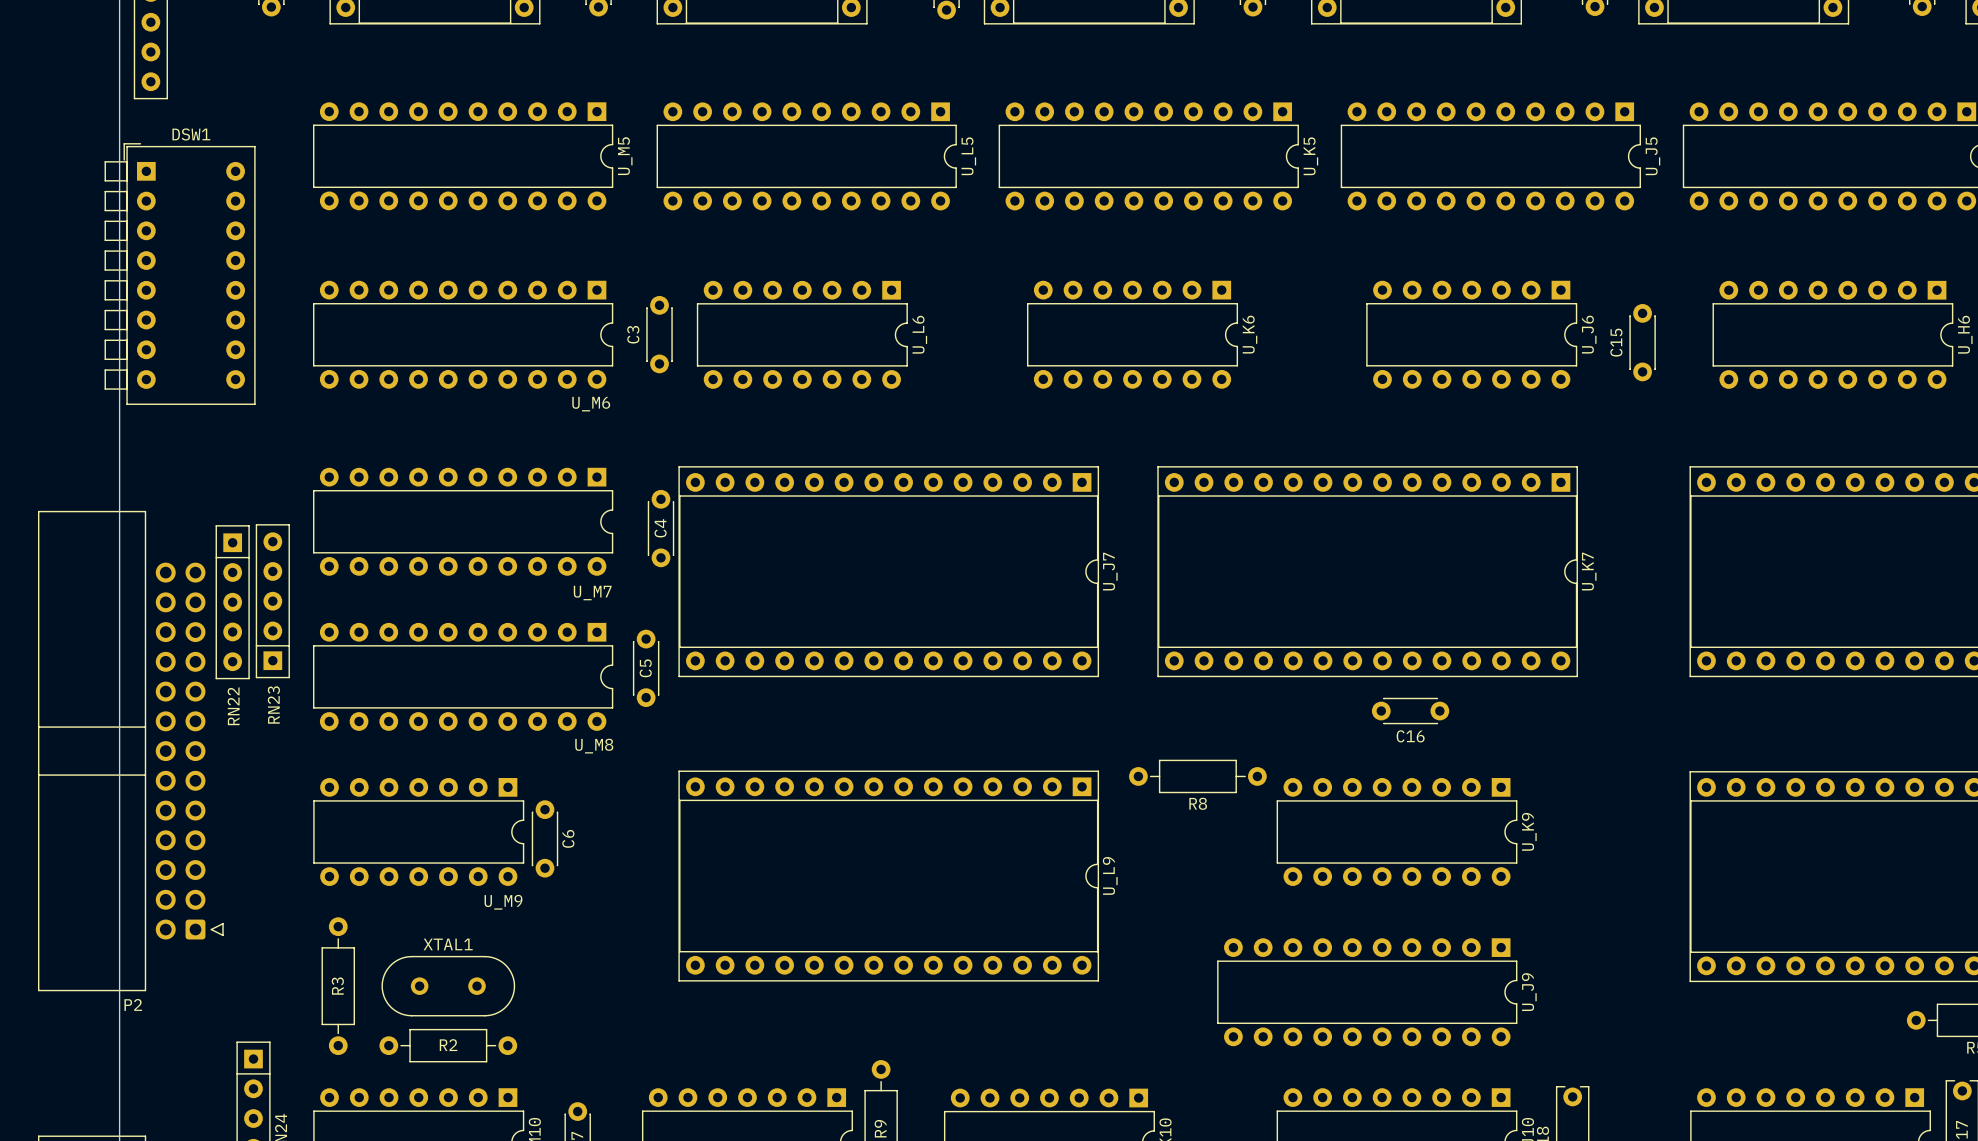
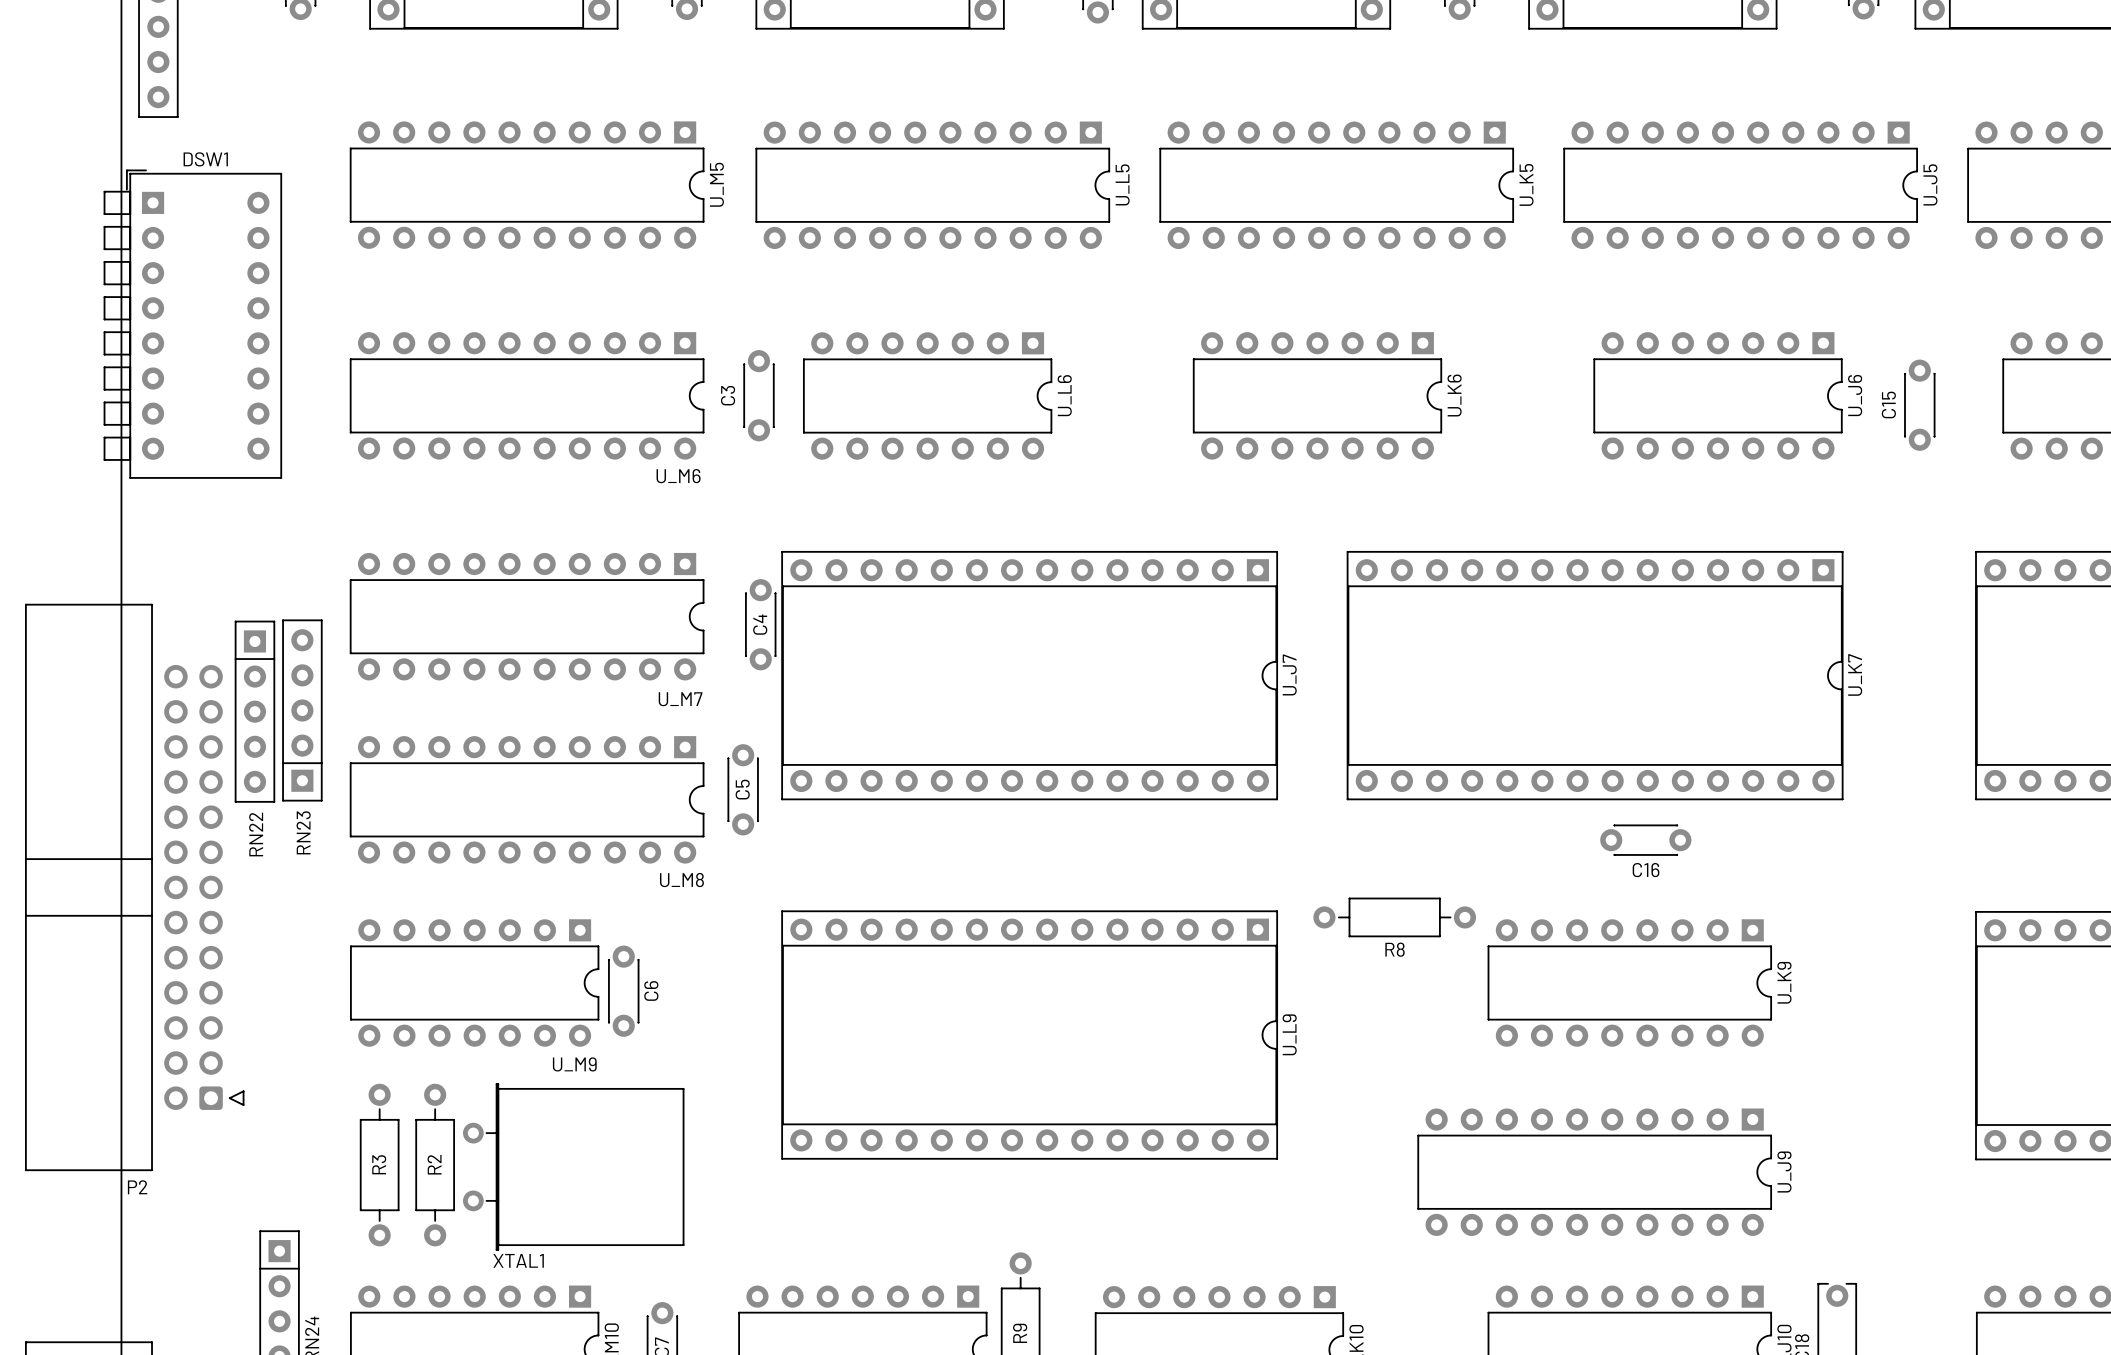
XTAL1 name position: XTAL1 (448, 944) -> XTAL1 (518, 1260)
XTAL1 footprint: [381, 955, 516, 1017] -> [462, 1083, 685, 1251]
R2 rotation: 0° (448, 1045) -> 90° clockwise (435, 1165)
R2 position: (448, 1045) -> (435, 1165)

